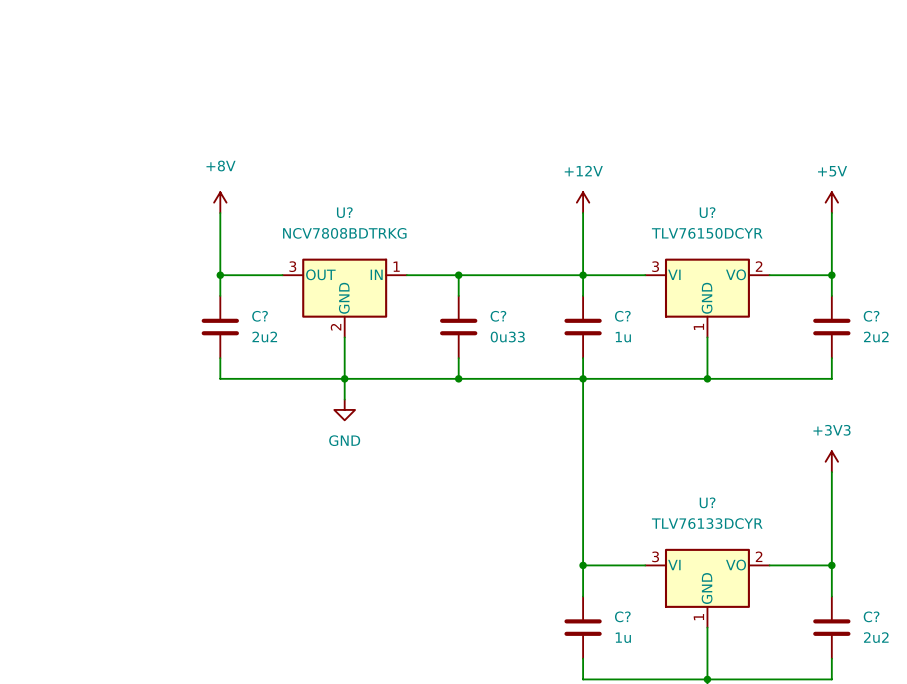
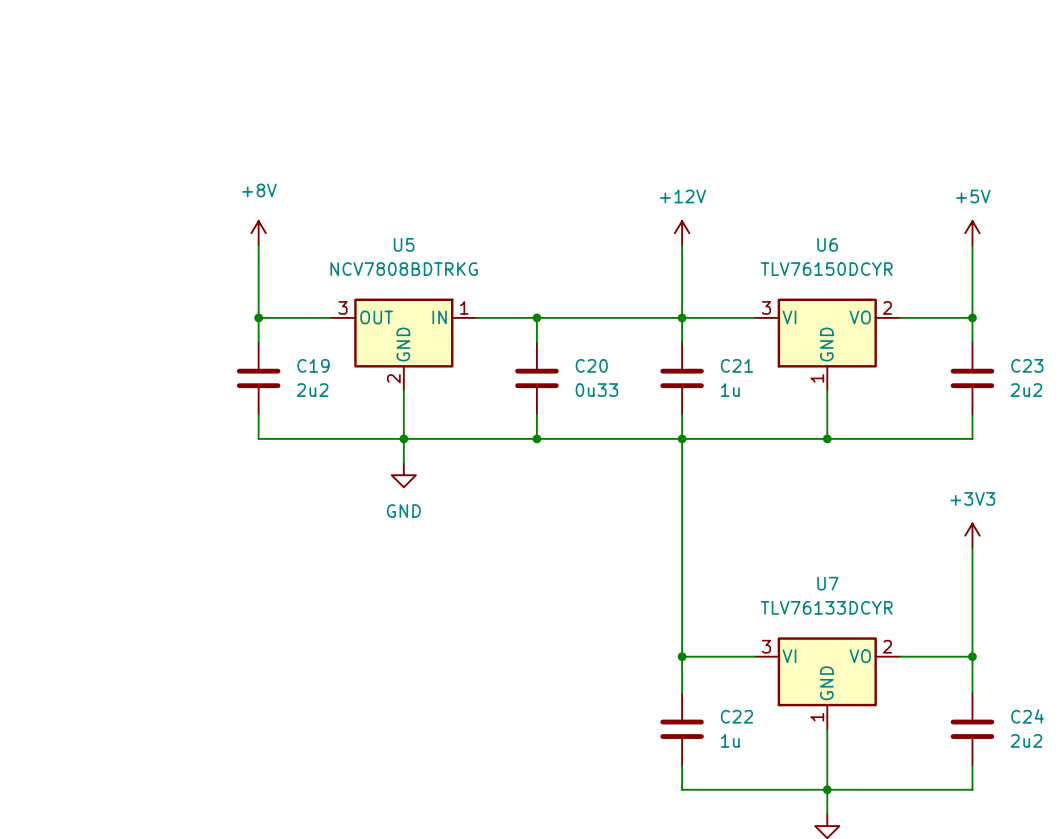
U? name: U? (344, 212) -> U5 (404, 244)
U? name: U? (707, 212) -> U6 (827, 244)
C? name: C? (260, 316) -> C19 (313, 365)
C? name: C? (498, 316) -> C20 (591, 365)
C? name: C? (622, 316) -> C21 (736, 365)
C? name: C? (871, 316) -> C23 (1027, 365)
U? name: U? (707, 502) -> U7 (827, 583)
C? name: C? (622, 616) -> C22 (736, 716)
C? name: C? (871, 616) -> C24 (1027, 716)

